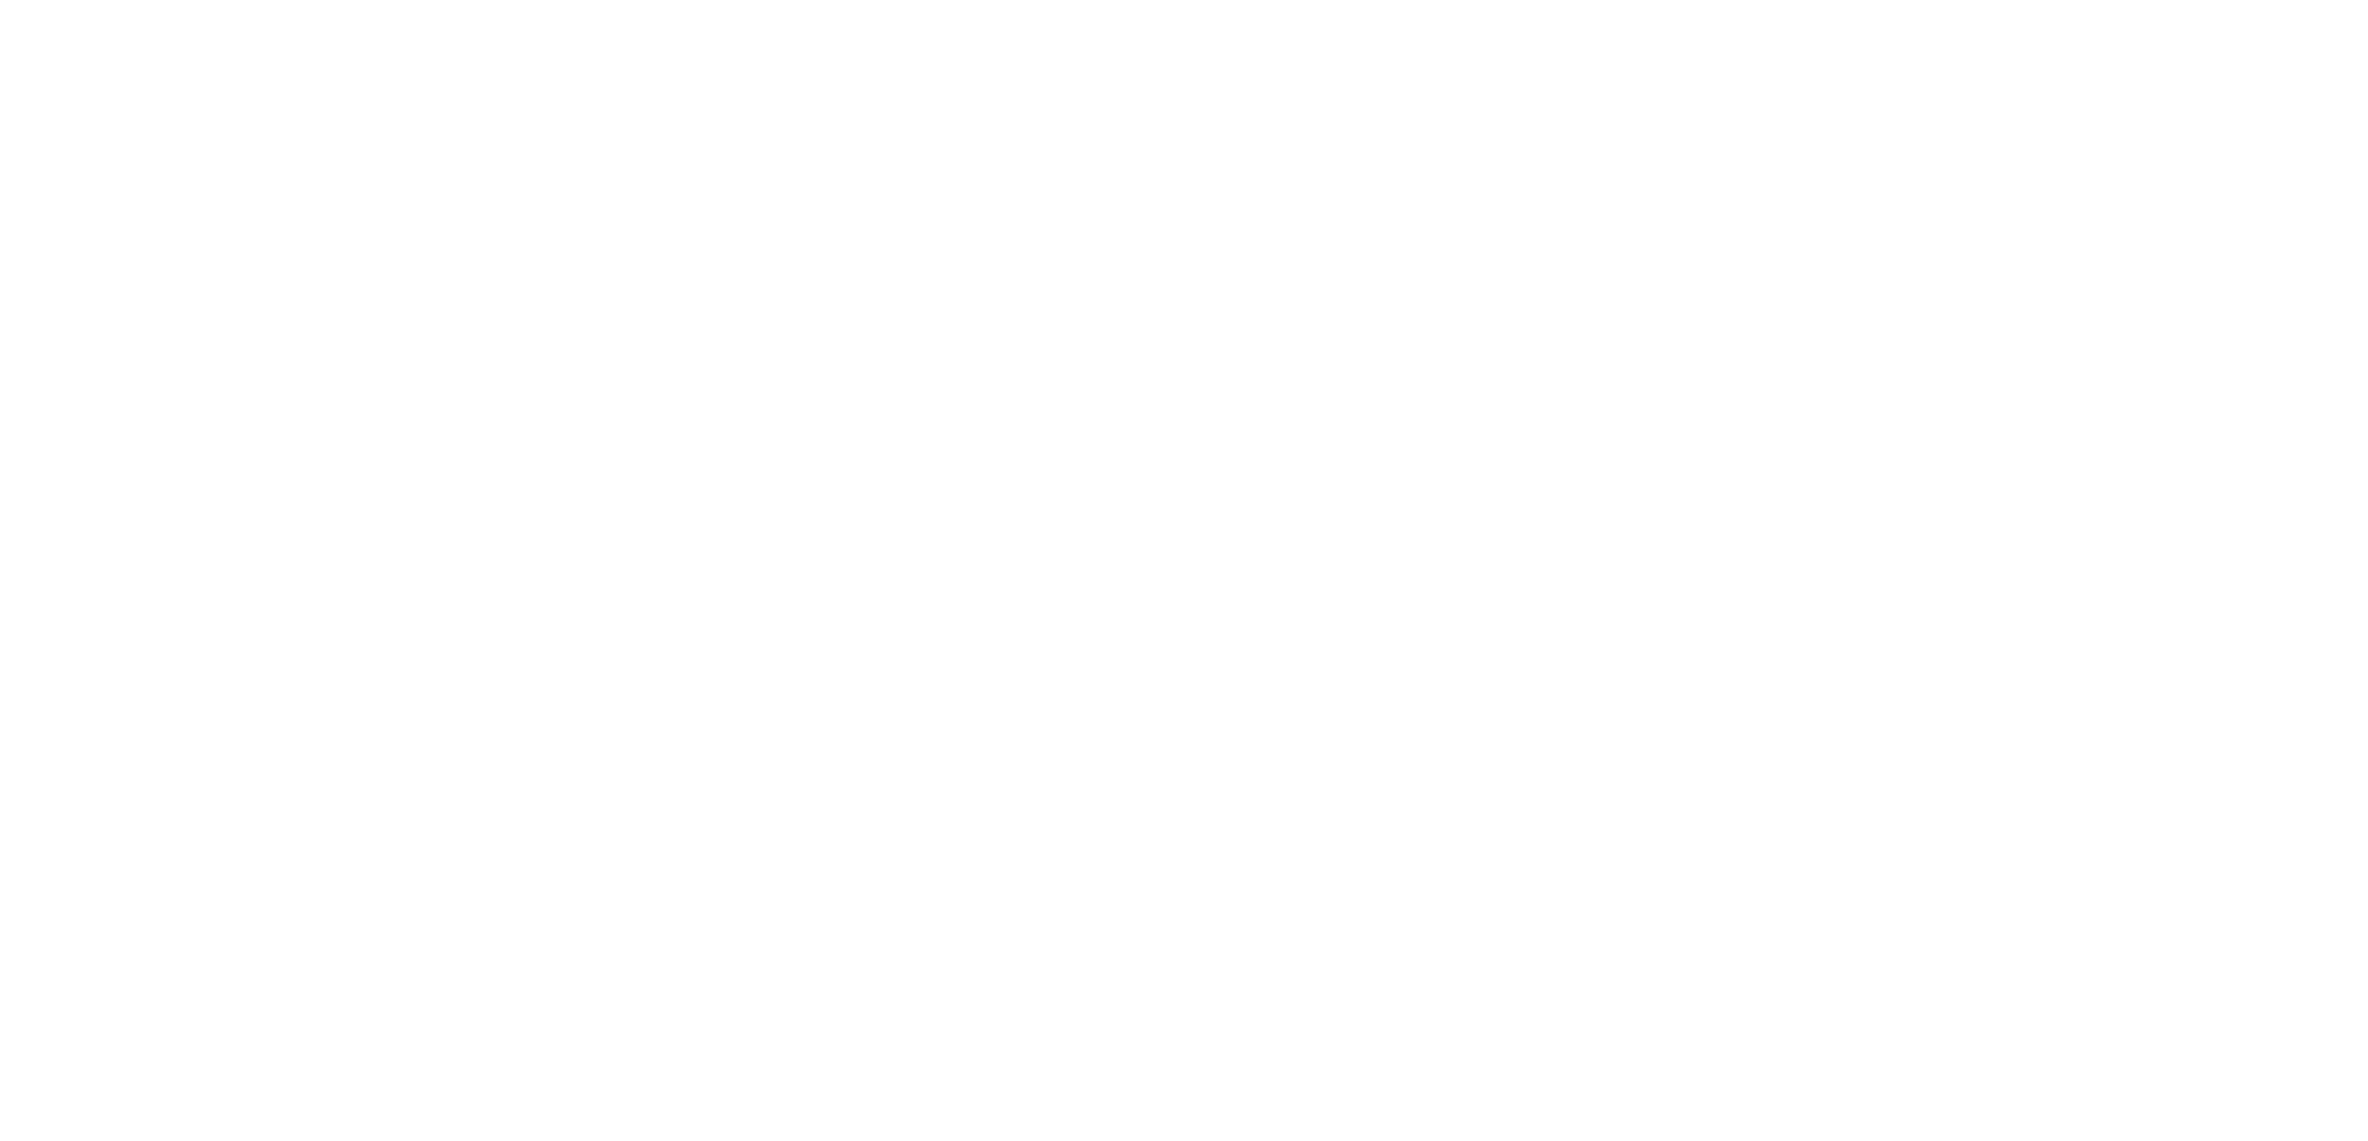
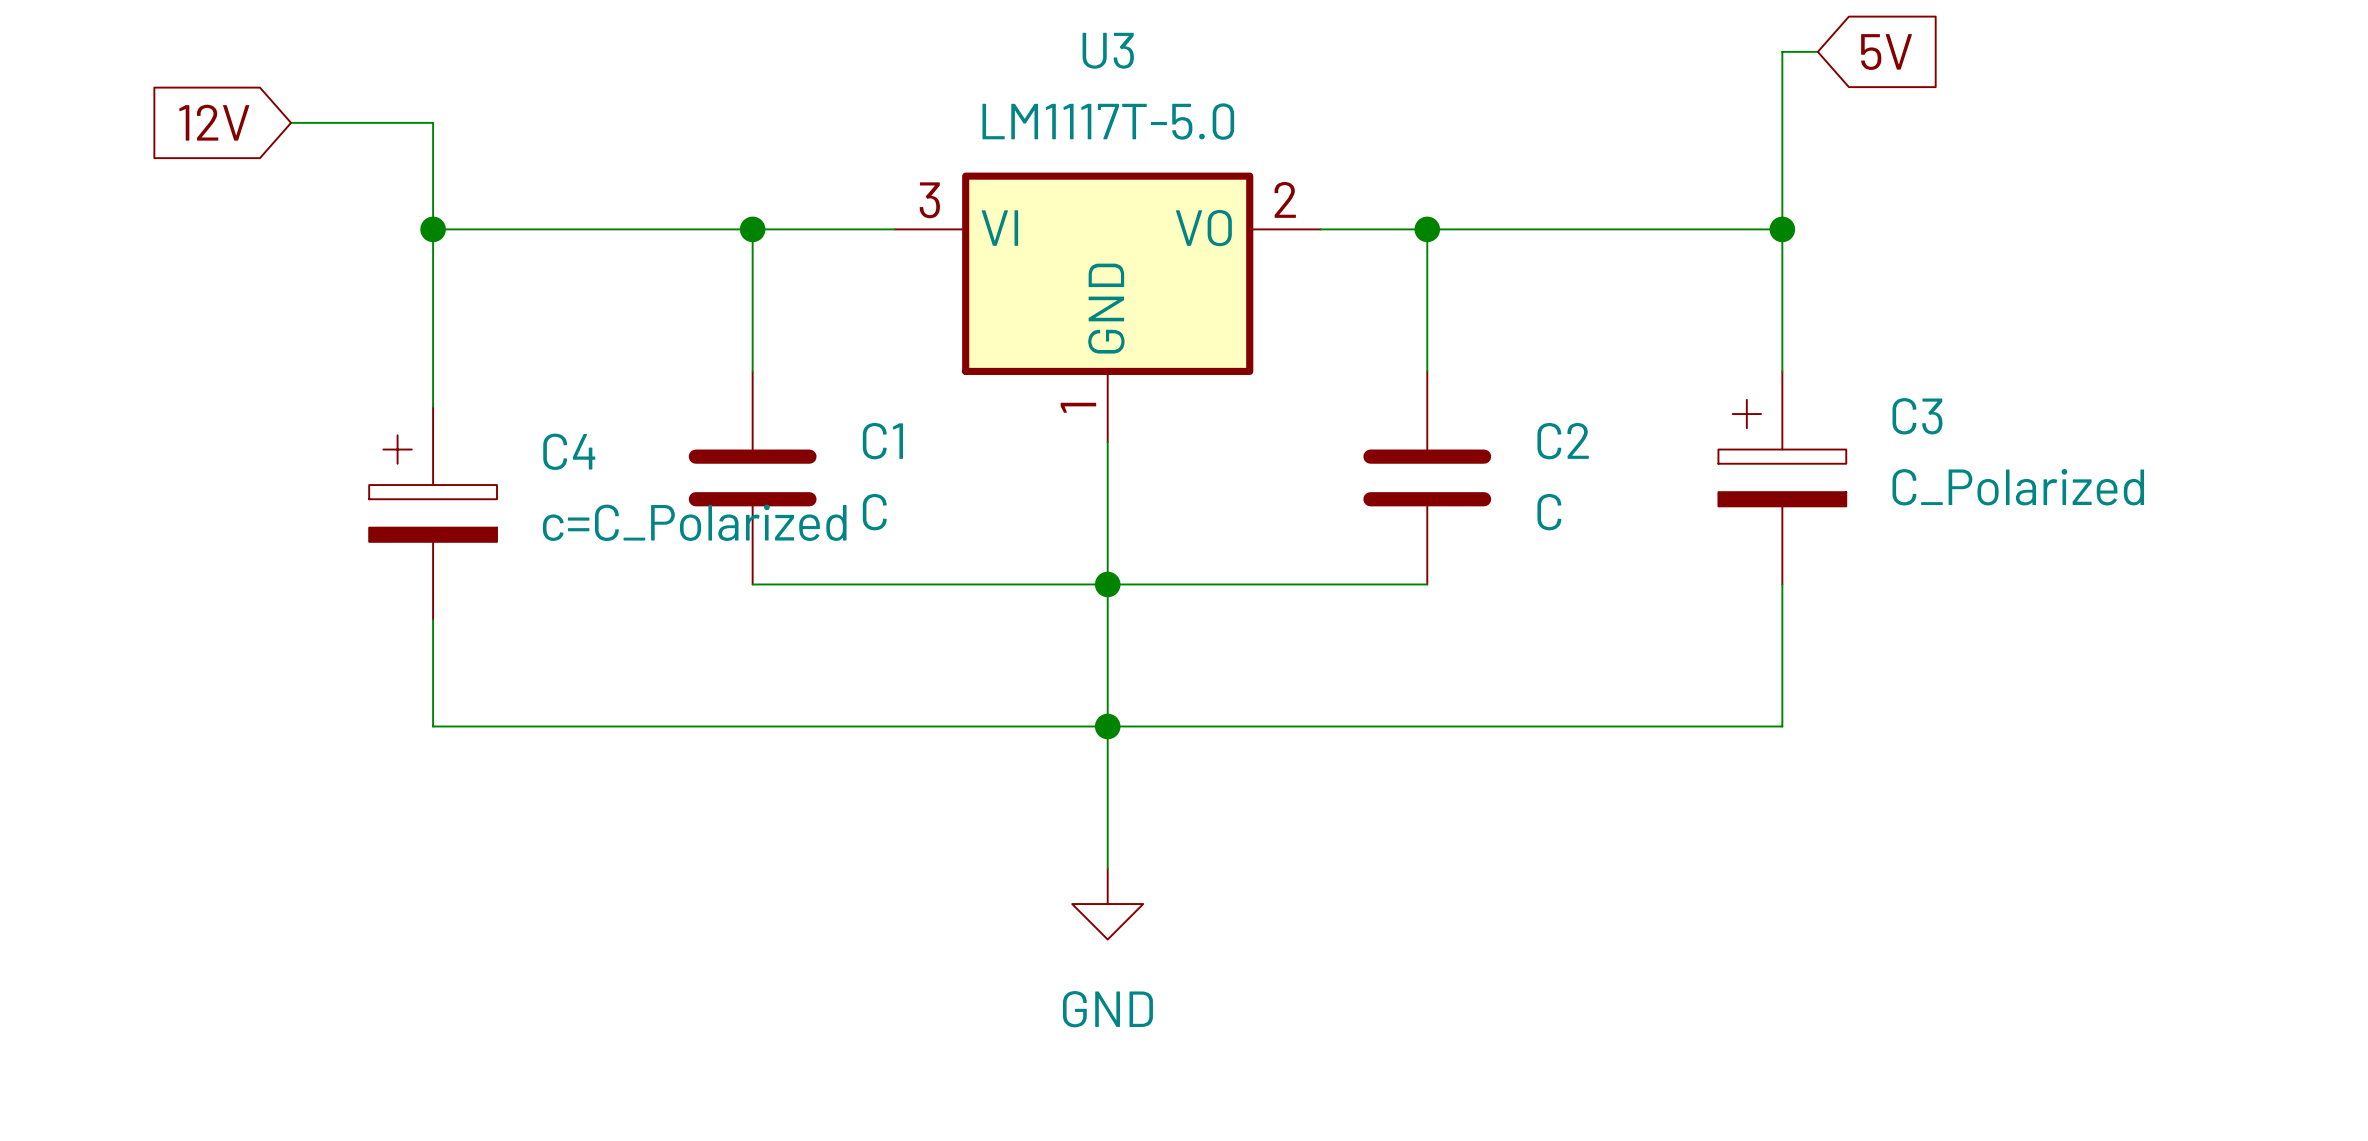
wire: none -> (1817, 51) (1782, 51) (1782, 371)
global label: none -> 5V (1886, 52)
global label: none -> 12V (214, 122)
wire: none -> (291, 122) (433, 122) (433, 406)
wire: none -> (433, 229) (894, 229)
junction: none -> (433, 229)
wire: none -> (752, 229) (752, 371)
junction: none -> (752, 229)
wire: none -> (1320, 229) (1782, 229)
wire: none -> (1427, 229) (1427, 371)
junction: none -> (1427, 229)
junction: none -> (1782, 229)
U3: none -> LM1117T-5.0 (1107, 307)
wire: none -> (1107, 442) (1107, 868)
C1: none -> C (752, 477)
C2: none -> C (1427, 477)
C3: none -> C_Polarized (1782, 477)
C4: none -> c=C_Polarized (433, 513)
wire: none -> (752, 584) (1427, 584)
junction: none -> (1107, 584)
wire: none -> (1782, 584) (1782, 726) (433, 726) (433, 619)
junction: none -> (1107, 726)
power symbol: none -> GND (1107, 904)

